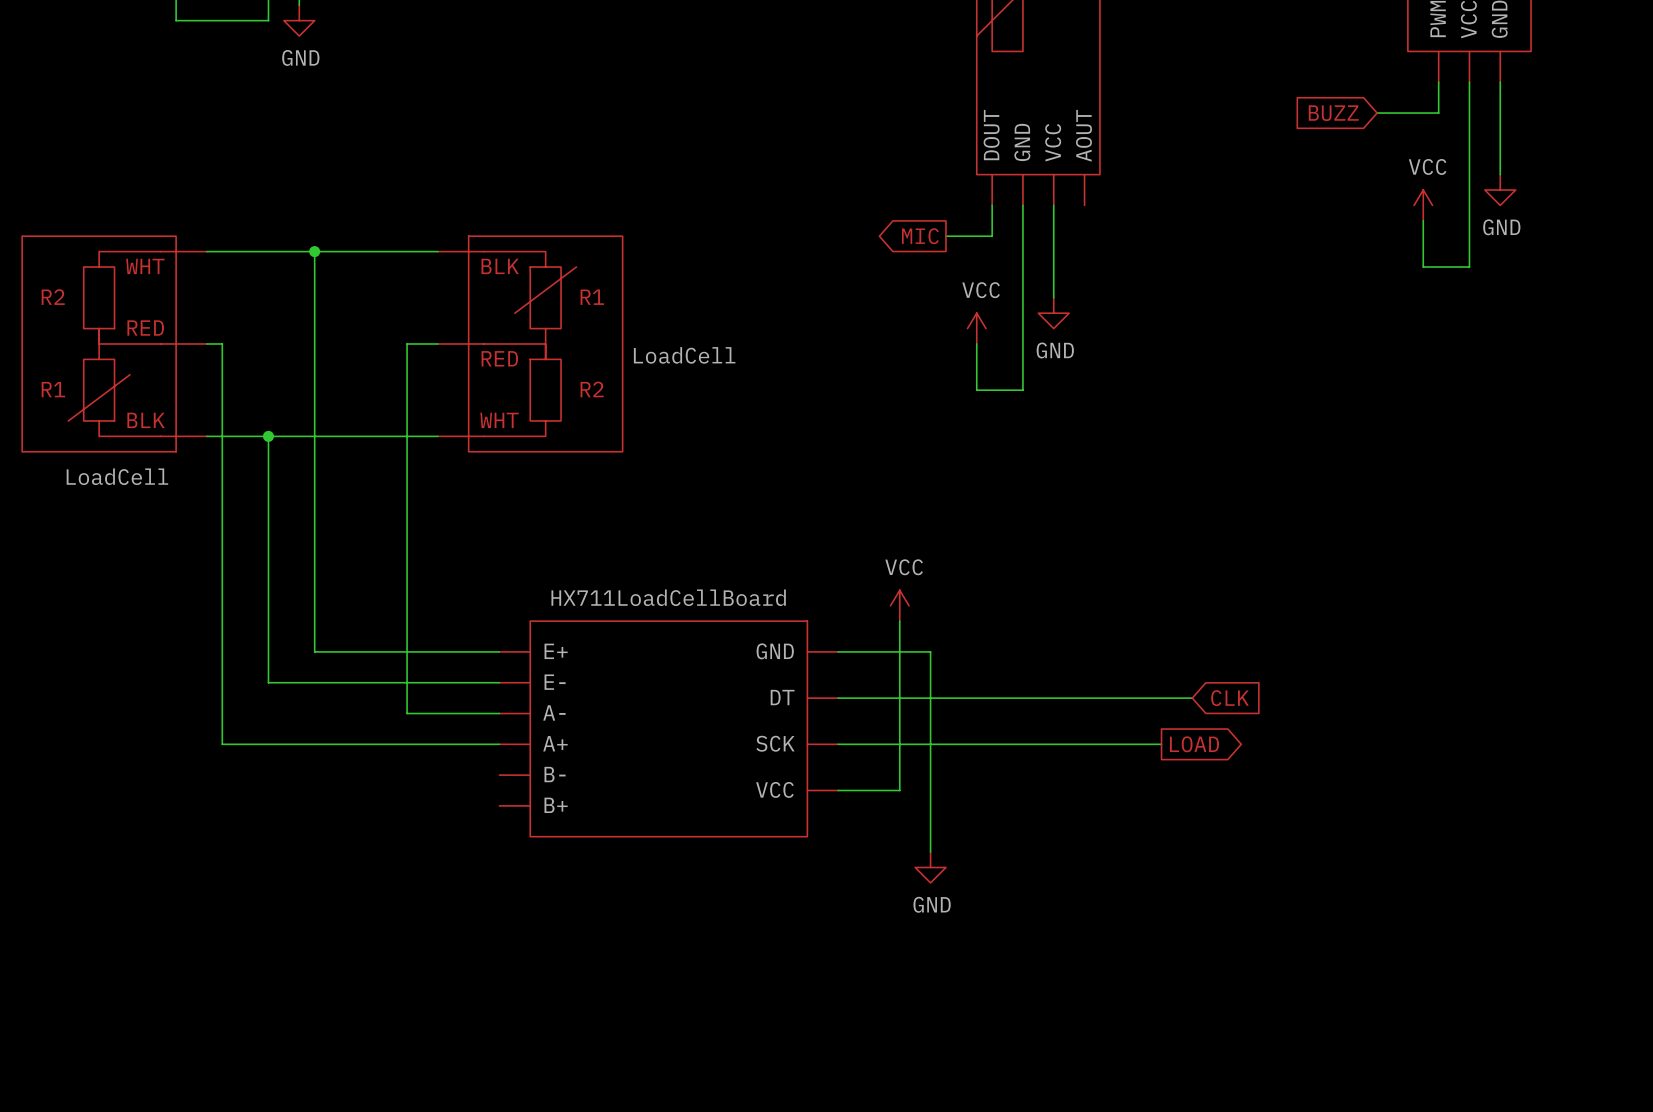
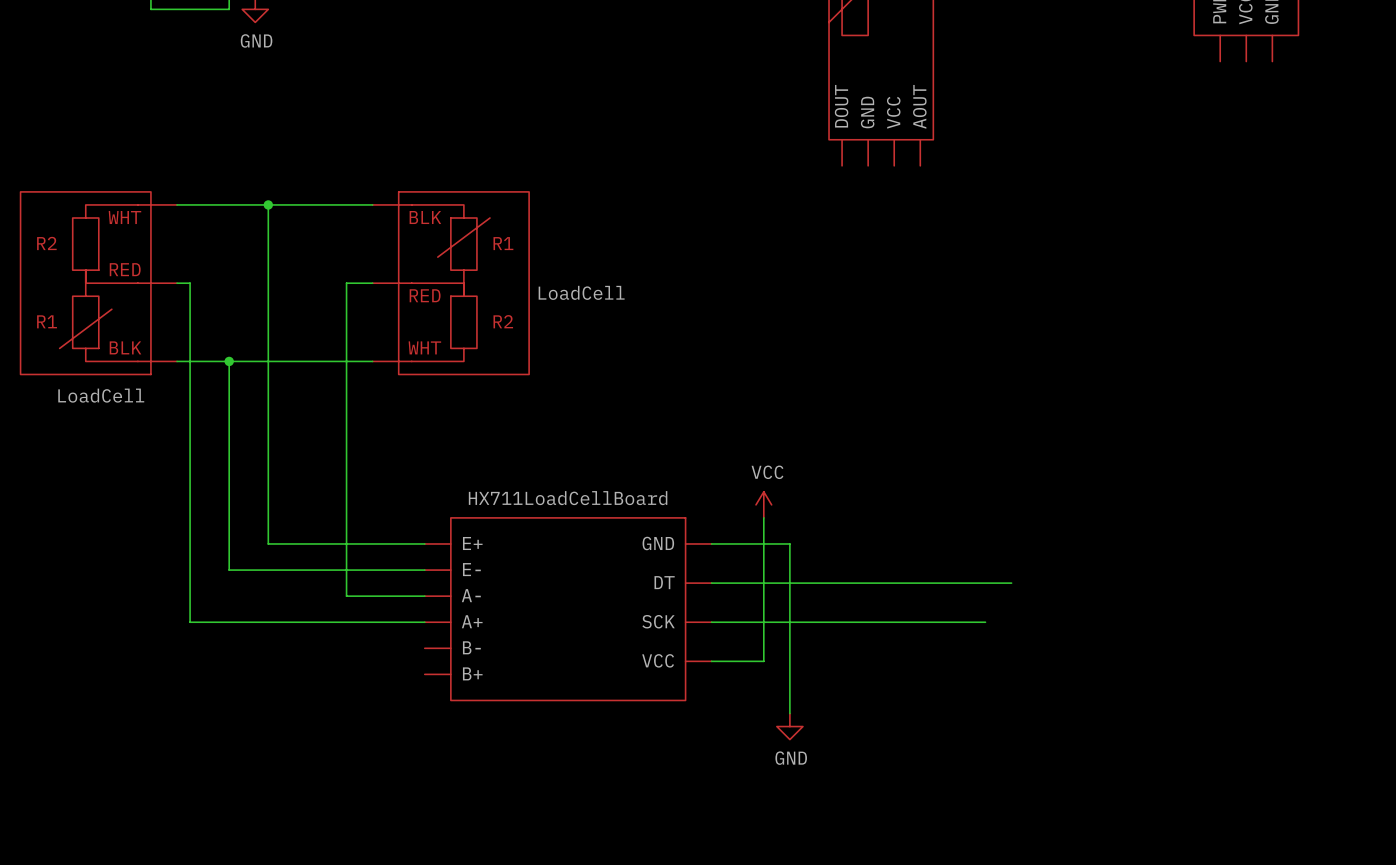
wire: (1438, 82) (1438, 113) (1377, 113) -> none
wire: (1469, 82) (1469, 267) (1423, 267) (1423, 220) -> none
wire: (1500, 82) (1500, 174) -> none
global label: BUZZ (1333, 113) -> none
power symbol: GND (1500, 190) -> none
wire: (992, 205) (992, 236) (945, 236) -> none
wire: (1022, 205) (1022, 390) (976, 390) (976, 343) -> none
wire: (1053, 205) (1053, 297) -> none
power symbol: VCC (1423, 205) -> none
global label: MIC (920, 236) -> none
power symbol: GND (1053, 313) -> none
power symbol: VCC (976, 328) -> none
global label: CLK (1230, 698) -> none
global label: LOAD (1194, 744) -> none

